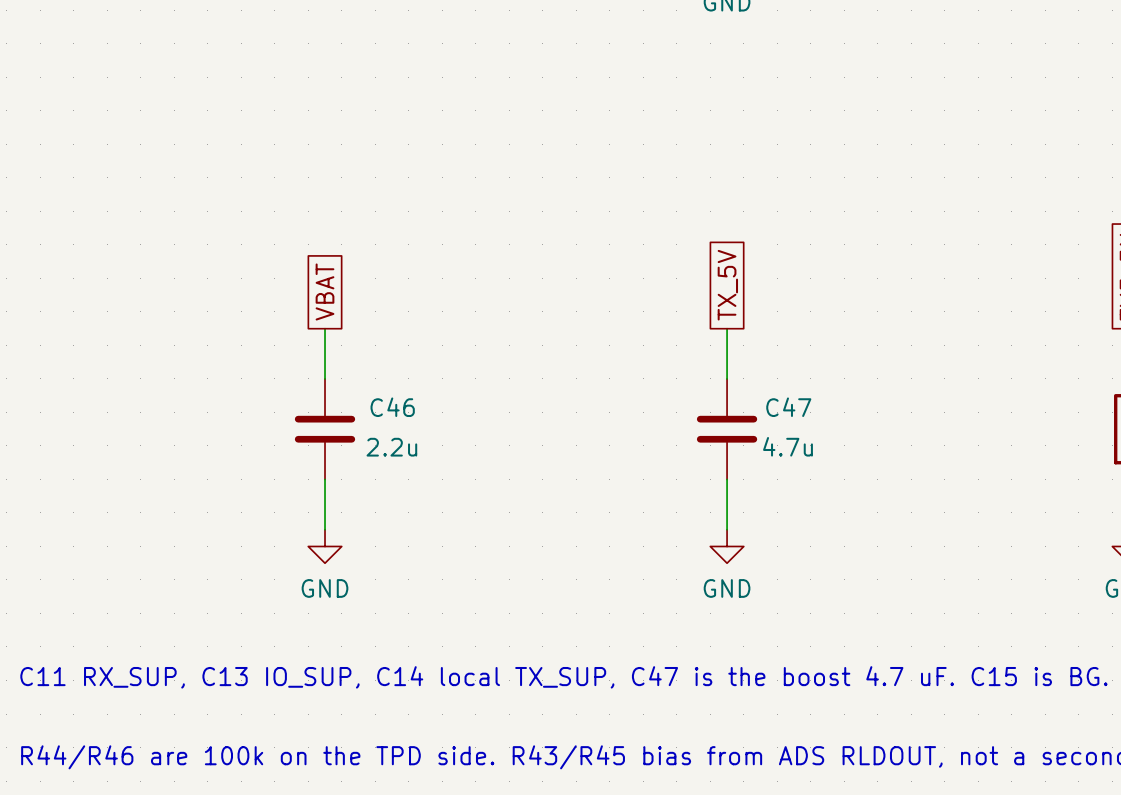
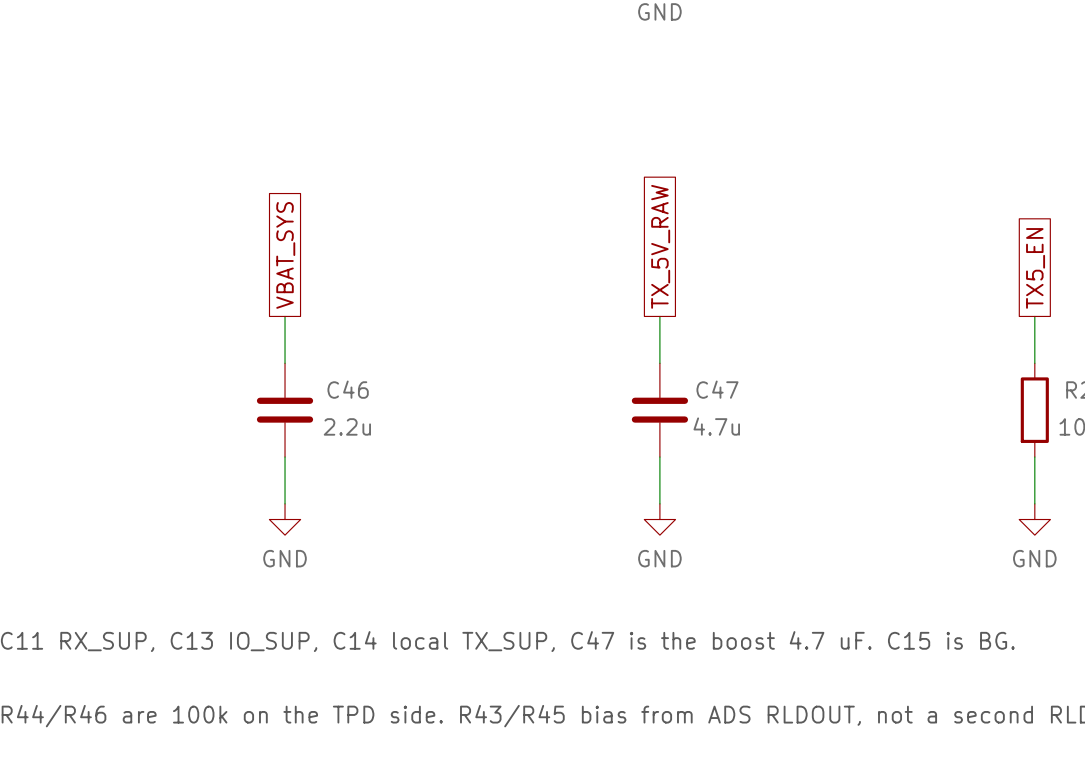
global label: TX_5V (727, 285) -> TX_5V_RAW (660, 246)
global label: VBAT (325, 291) -> VBAT_SYS (285, 255)

